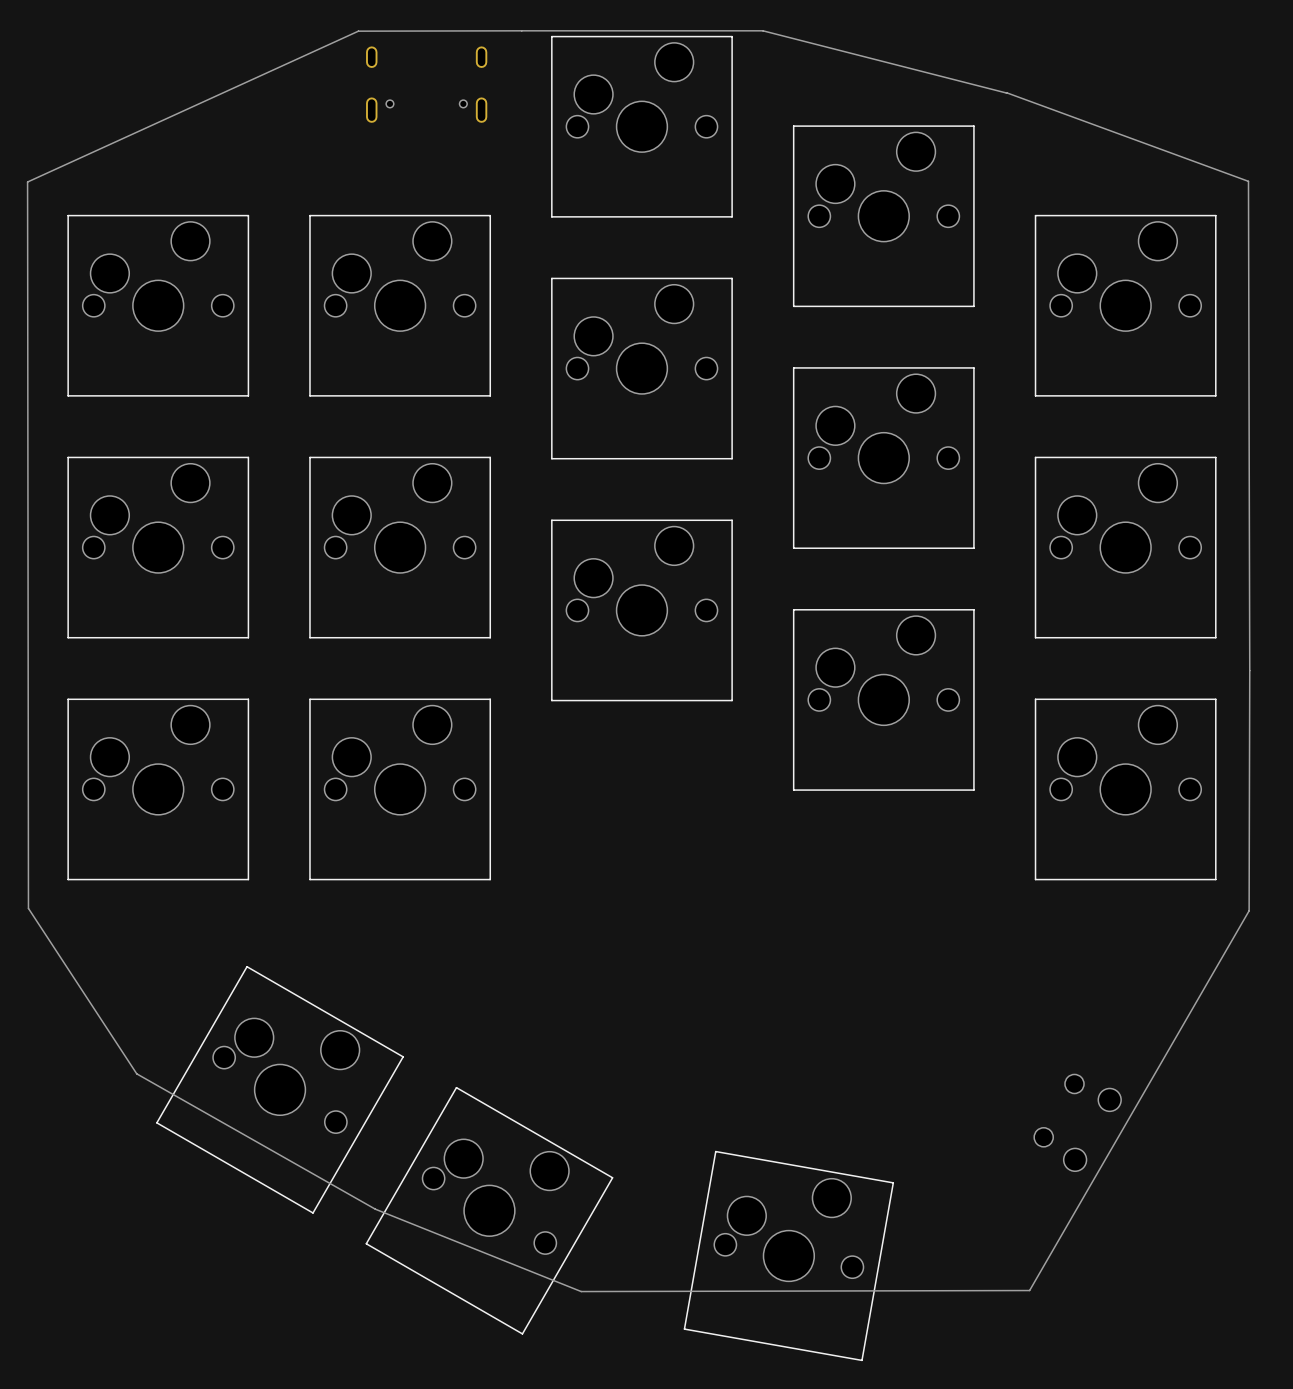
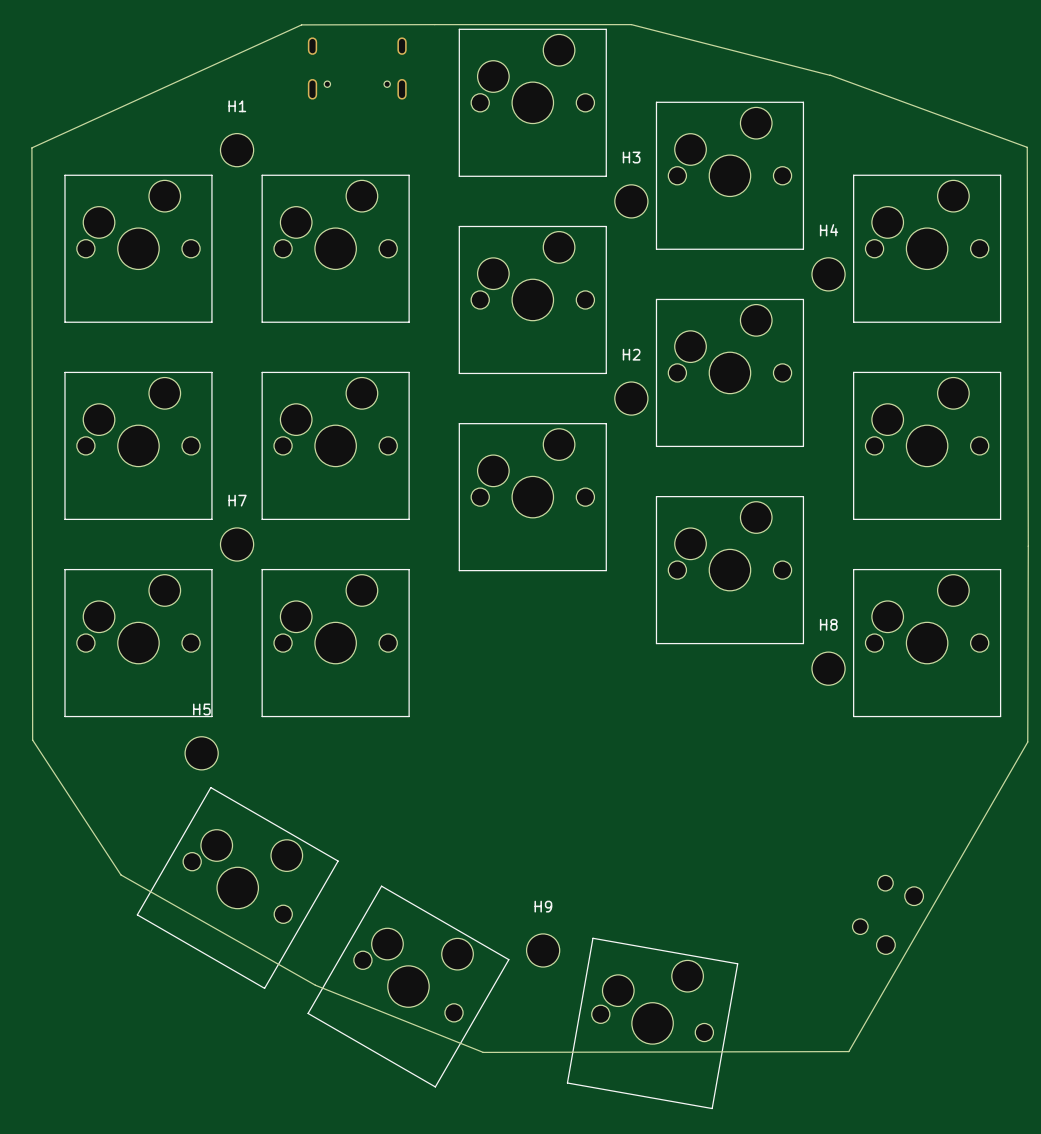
H1: none -> (237, 150)
H3: none -> (631, 201)
H4: none -> (828, 274)
H2: none -> (631, 398)
H7: none -> (237, 544)
H8: none -> (828, 668)
H5: none -> (201, 753)
H9: none -> (543, 950)

